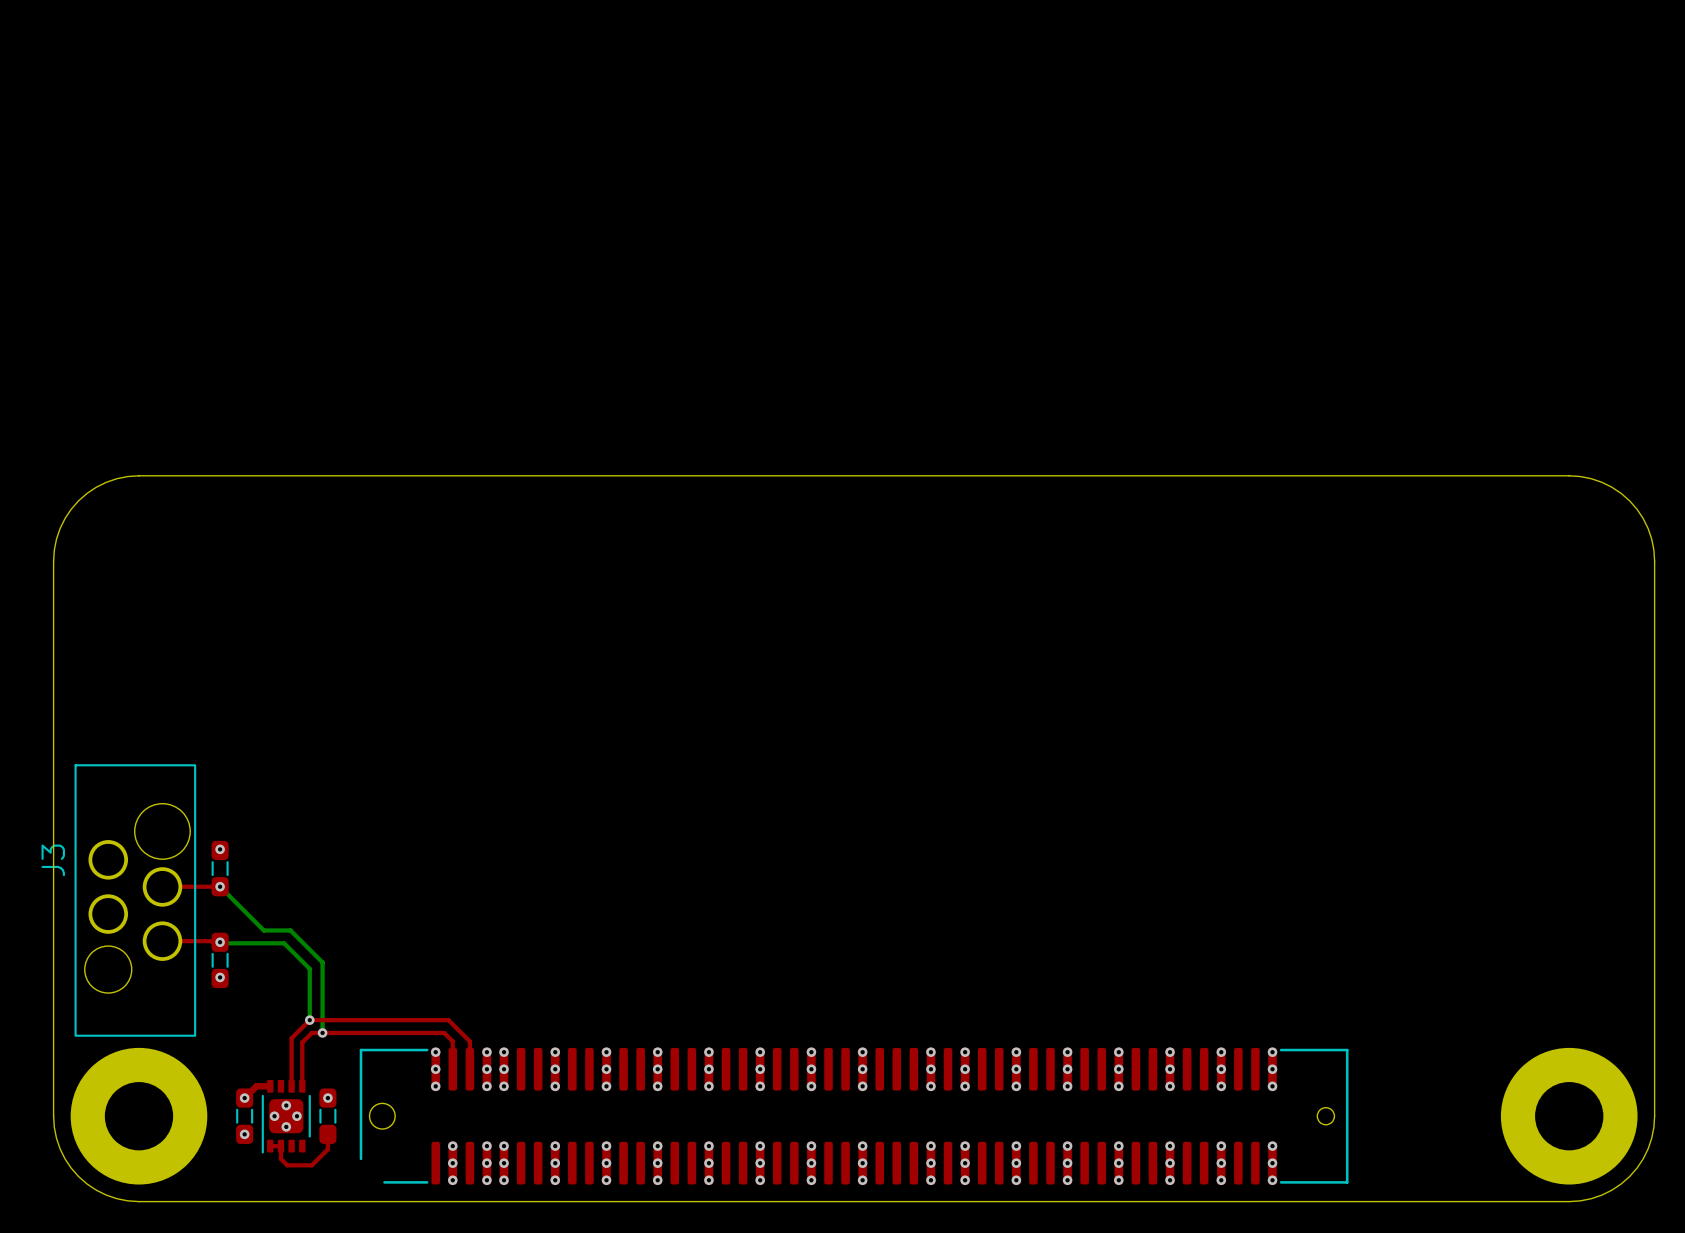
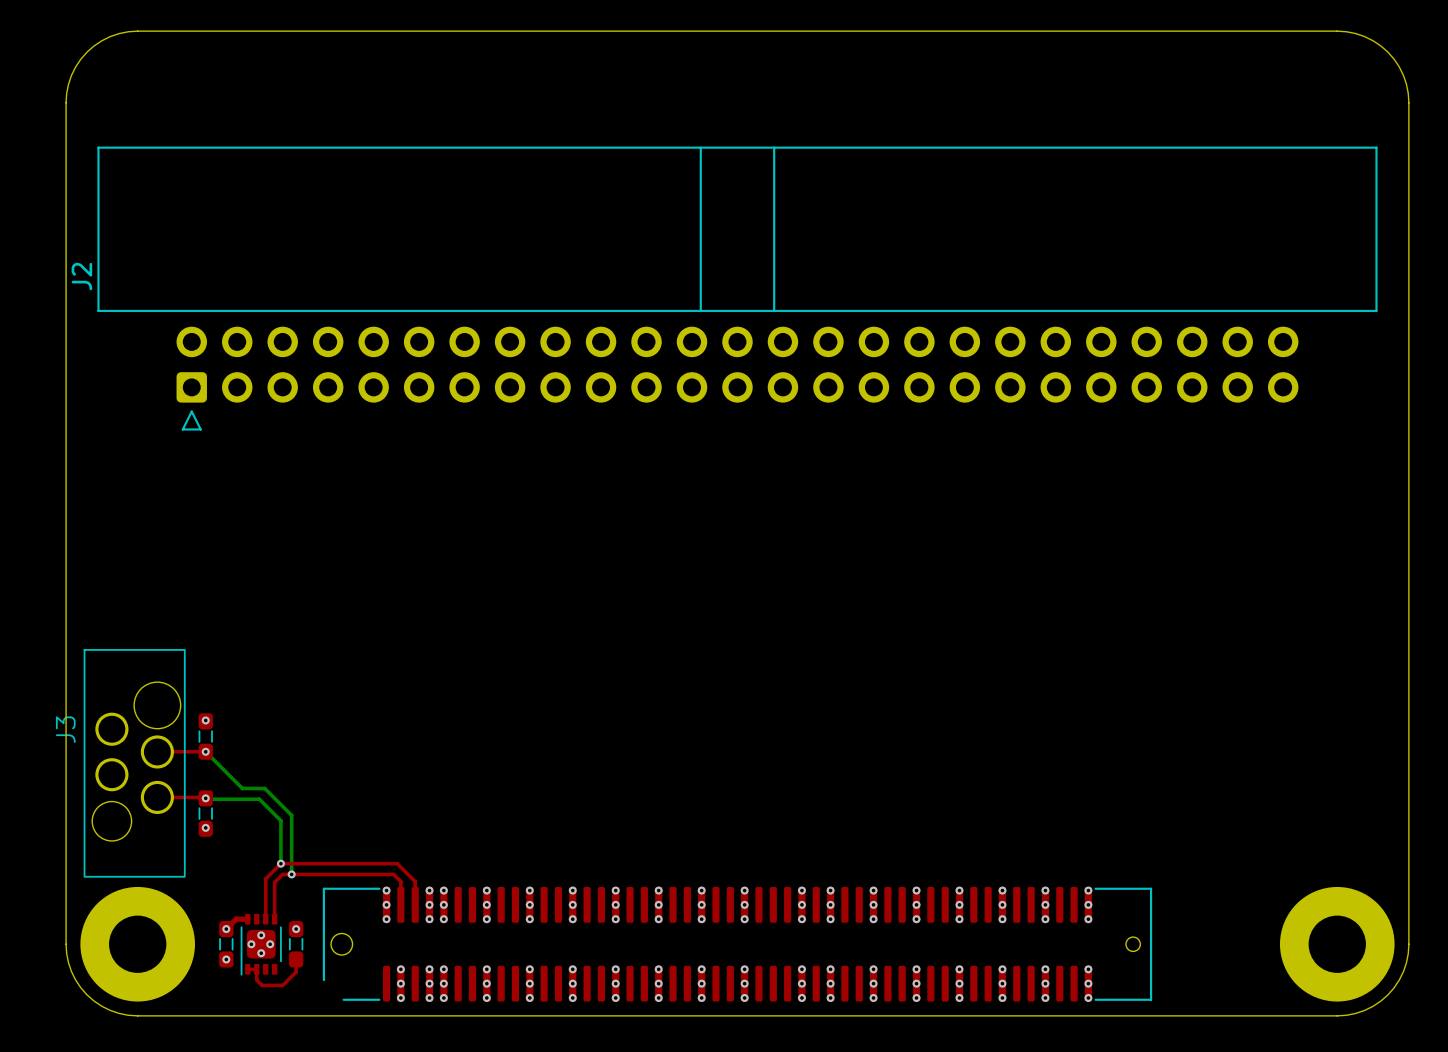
J2: none -> (737, 288)
board edge: (53, 561) (60, 528) (78, 500) (106, 482) (138, 475) (1569, 475) (1601, 482) (1629, 500) (1648, 528) (1654, 561) -> (66, 478) (66, 93) (75, 66) (87, 52) (110, 36) (137, 31) (1337, 31) (1364, 36) (1380, 45) (1394, 59) (1403, 75) (1408, 93) (1408, 478)

